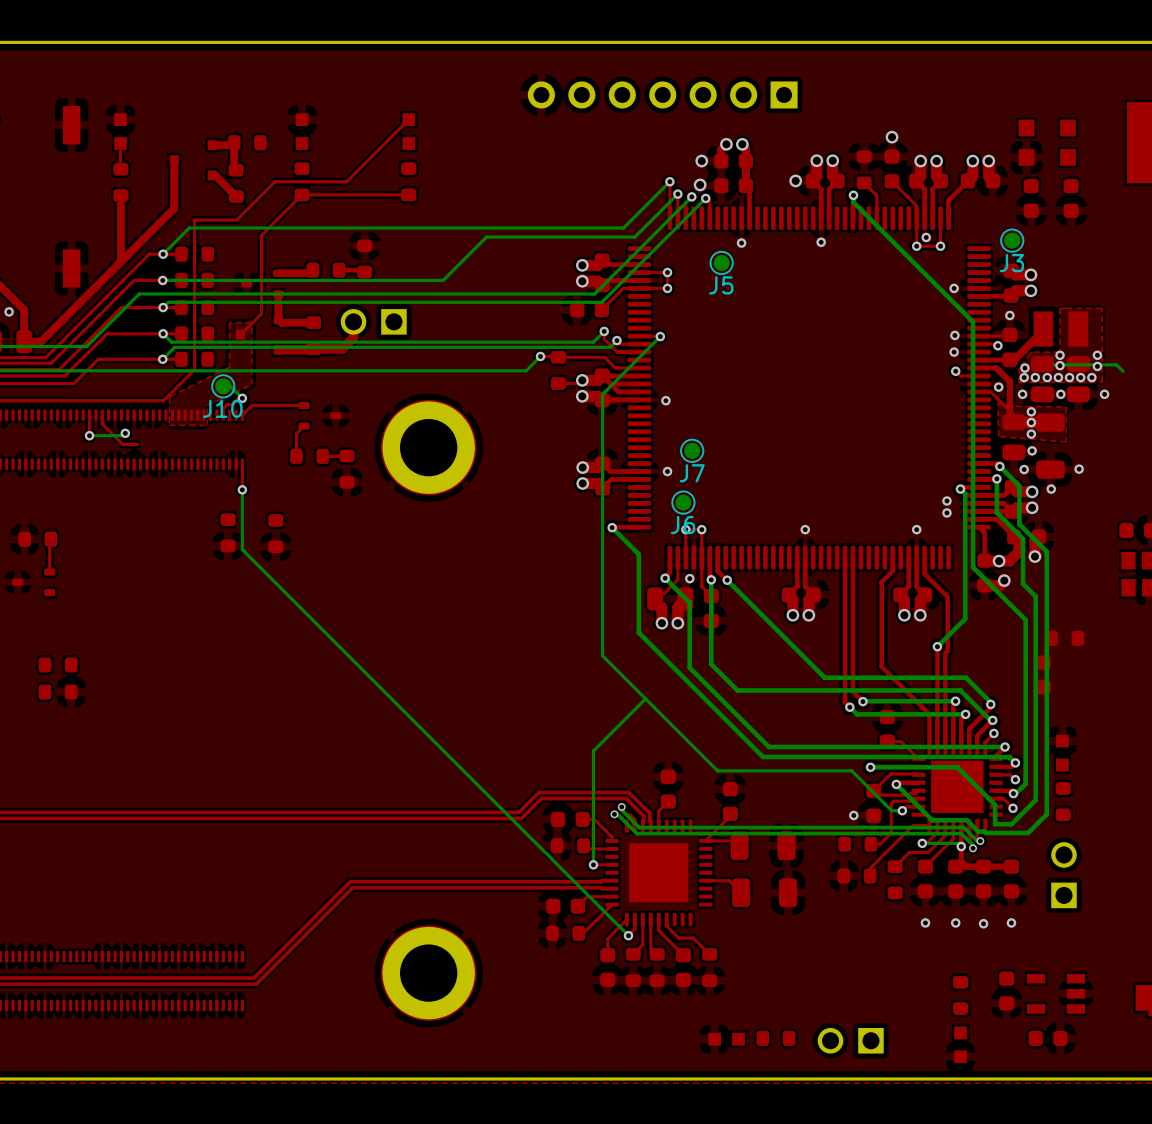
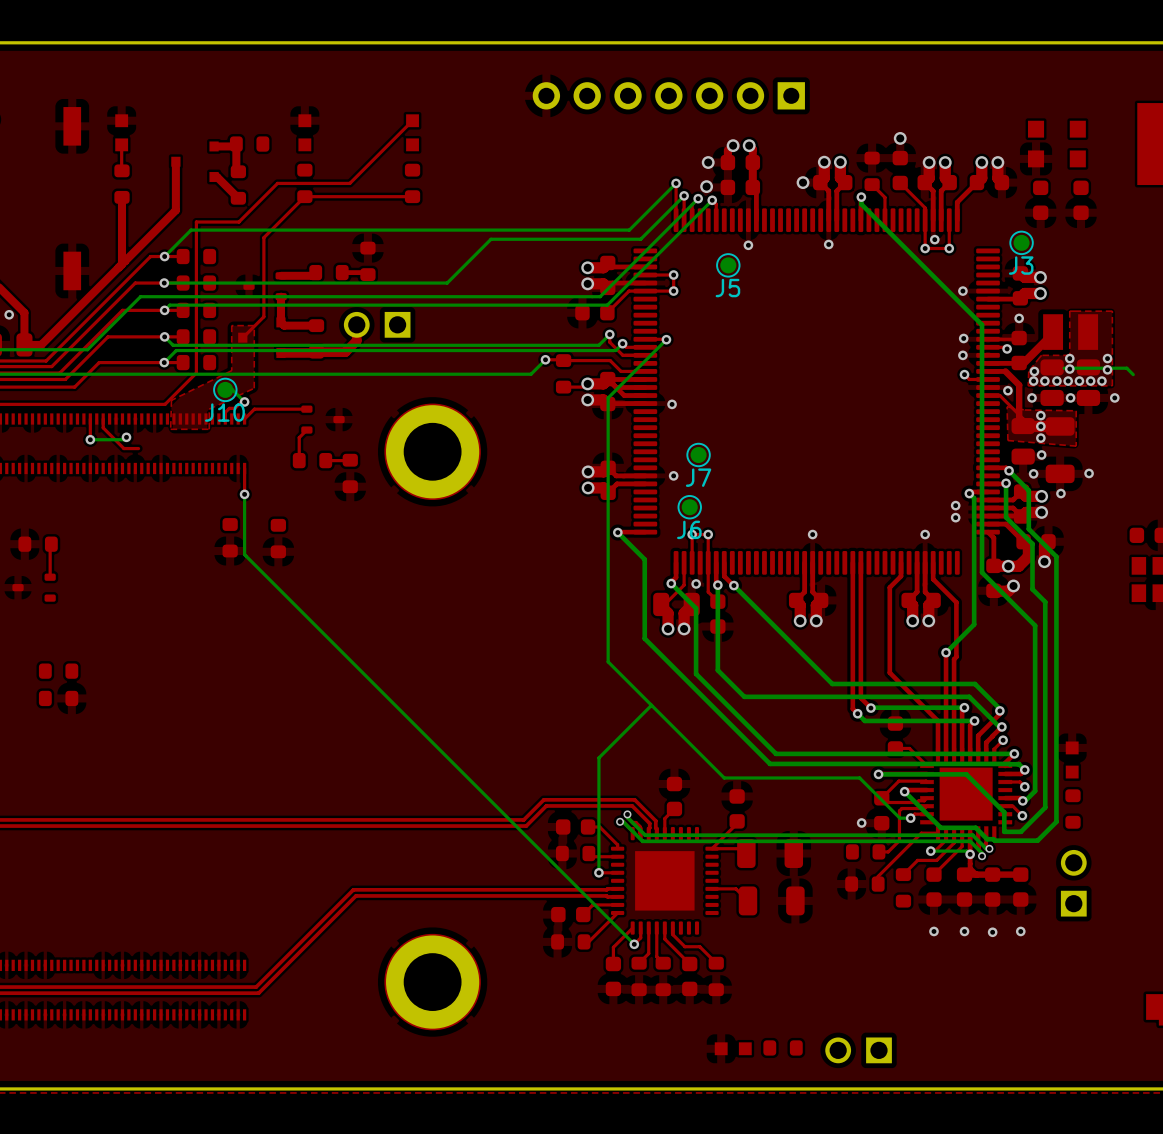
part: (1064, 638) -> none
part: (1043, 674) -> none
part: (1006, 991) -> none
part: (1056, 993) -> none
part: (960, 995) -> none
part: (1048, 1038) -> none
part: (960, 1044) -> none

